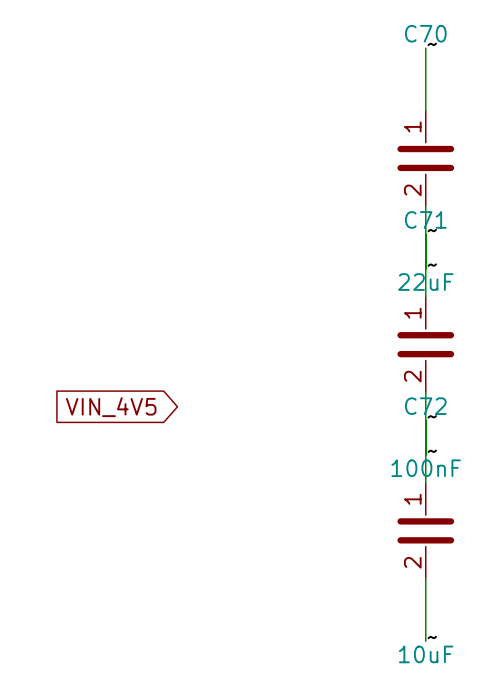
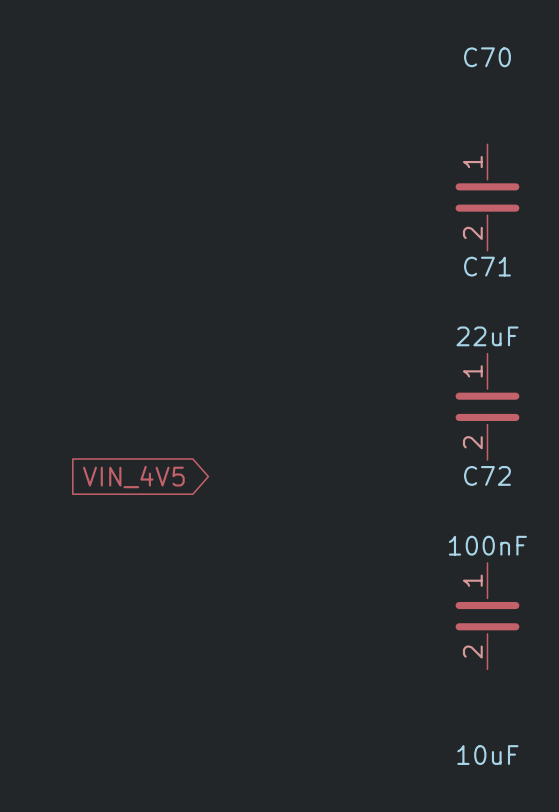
label: ~ (432, 44) -> none
wire: (425, 48) (425, 111) -> none
wire: (425, 205) (425, 297) -> none
label: ~ (432, 230) -> none
label: ~ (432, 265) -> none
wire: (425, 391) (425, 483) -> none
label: ~ (432, 416) -> none
label: ~ (432, 451) -> none
wire: (425, 578) (425, 641) -> none
label: ~ (432, 637) -> none

